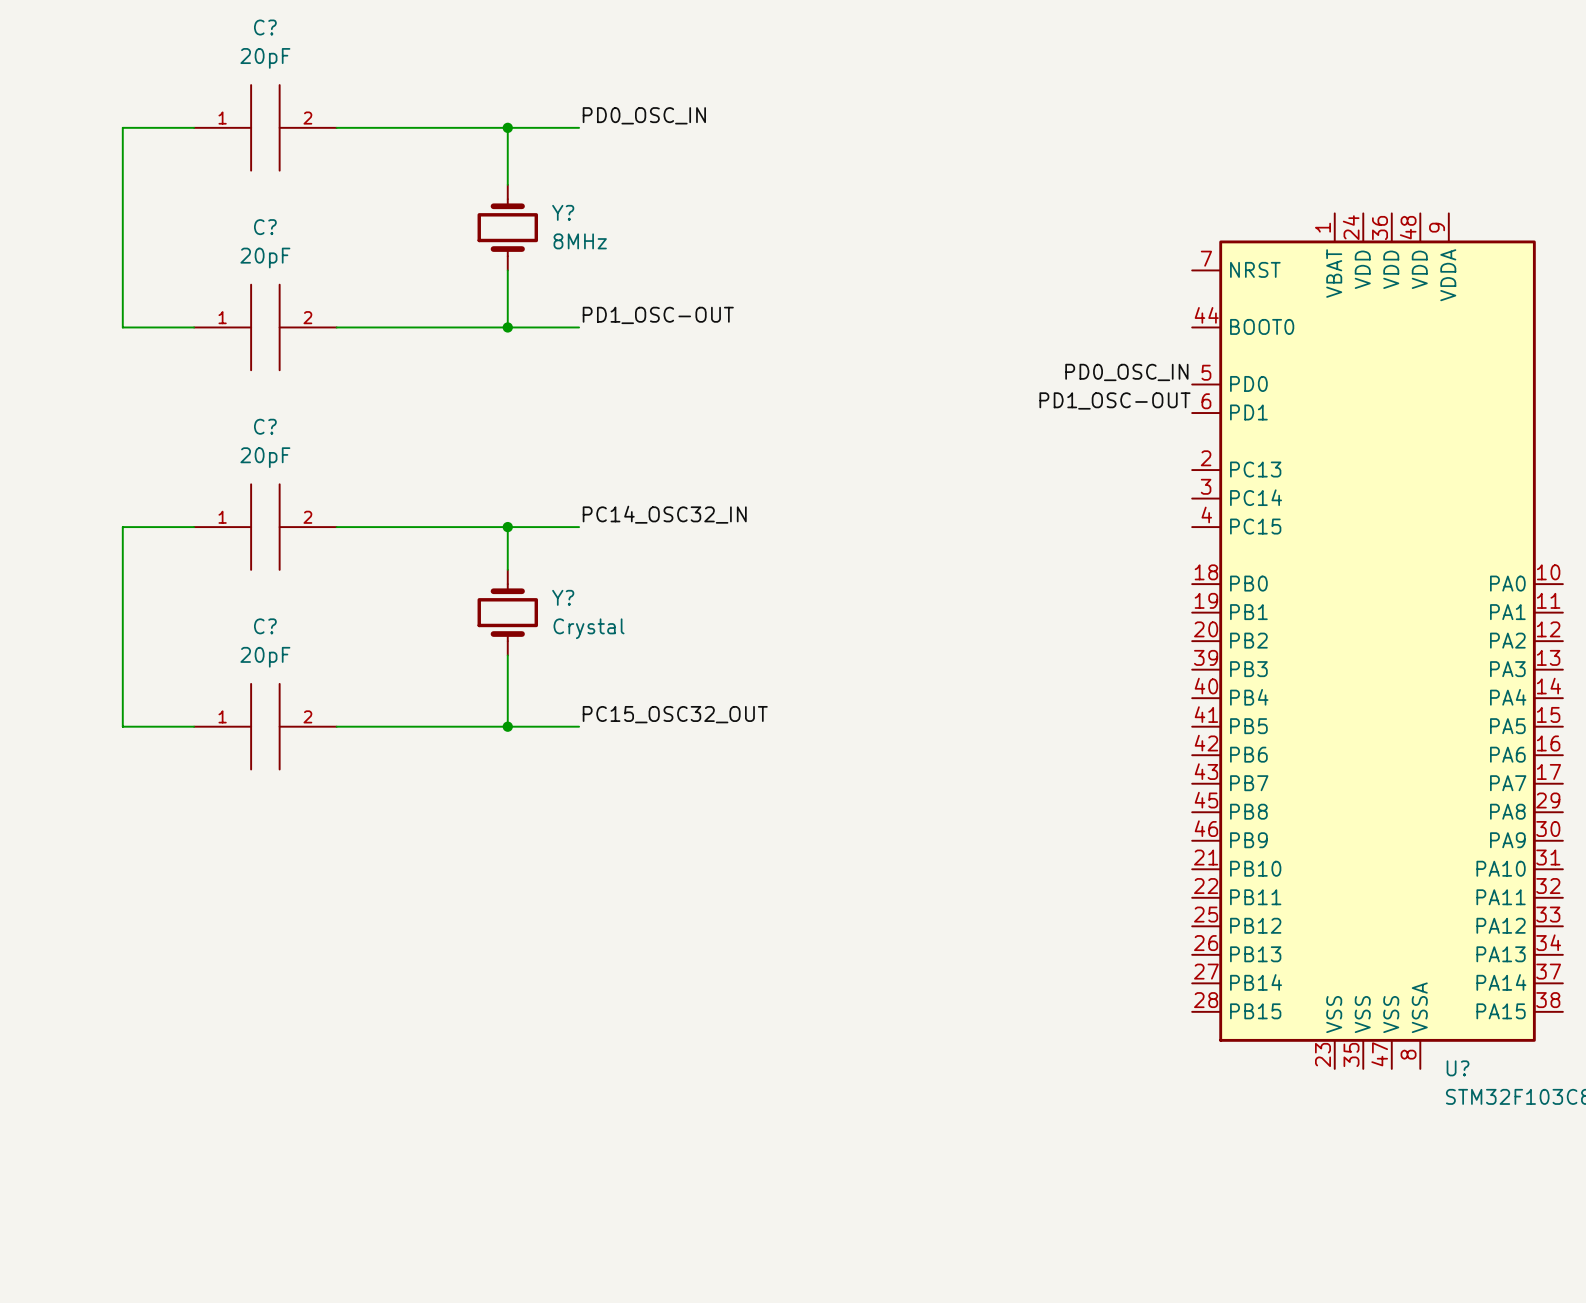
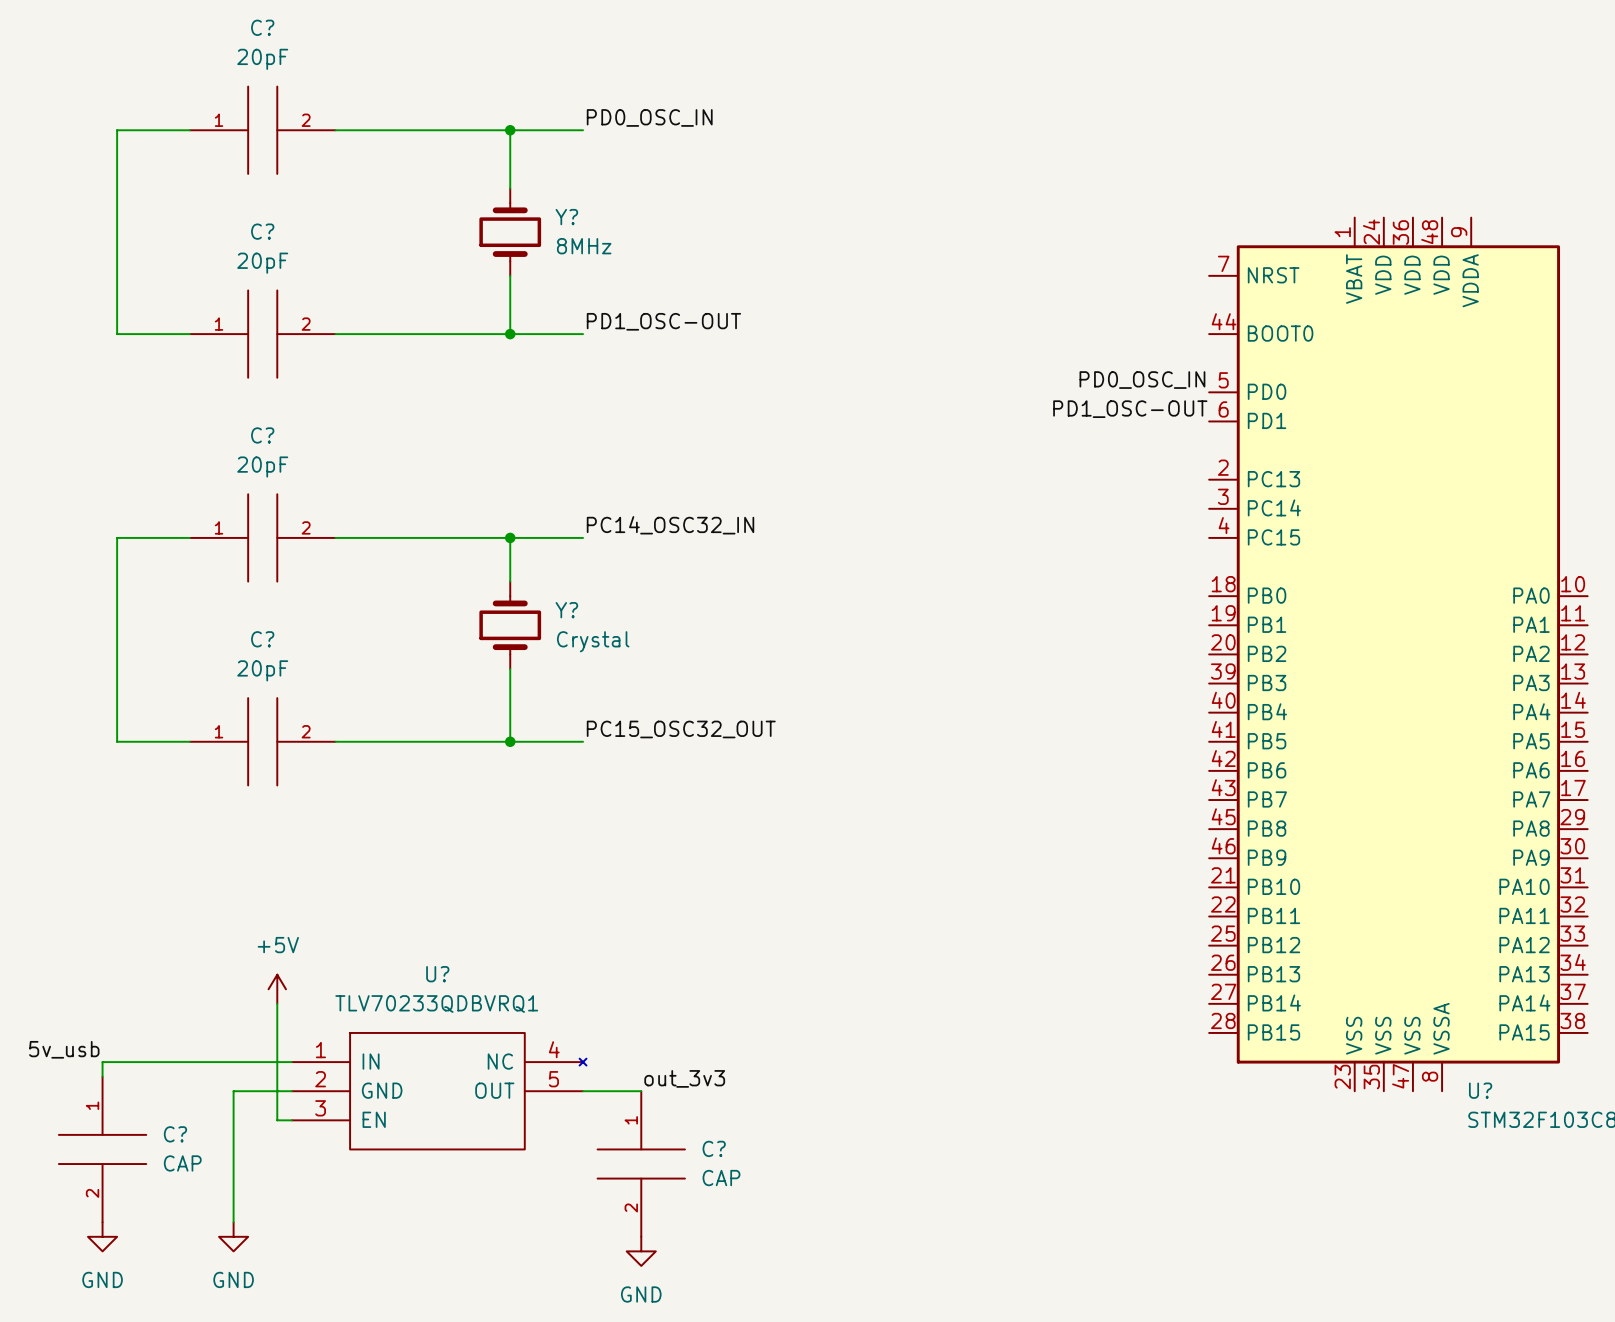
power symbol: none -> +5V (277, 989)
wire: none -> (277, 1003) (277, 1120) (291, 1120)
label: none -> 5v_usb (64, 1049)
wire: none -> (291, 1062) (102, 1062) (102, 1076)
label: none -> out_3v3 (684, 1078)
wire: none -> (291, 1091) (233, 1091) (233, 1222)
U?: none -> TLV70233QDBVRQ1 (439, 1091)
wire: none -> (583, 1091) (641, 1091)
C?: none -> CAP (102, 1149)
C?: none -> CAP (641, 1164)
power symbol: none -> GND (102, 1236)
power symbol: none -> GND (233, 1236)
power symbol: none -> GND (641, 1251)

